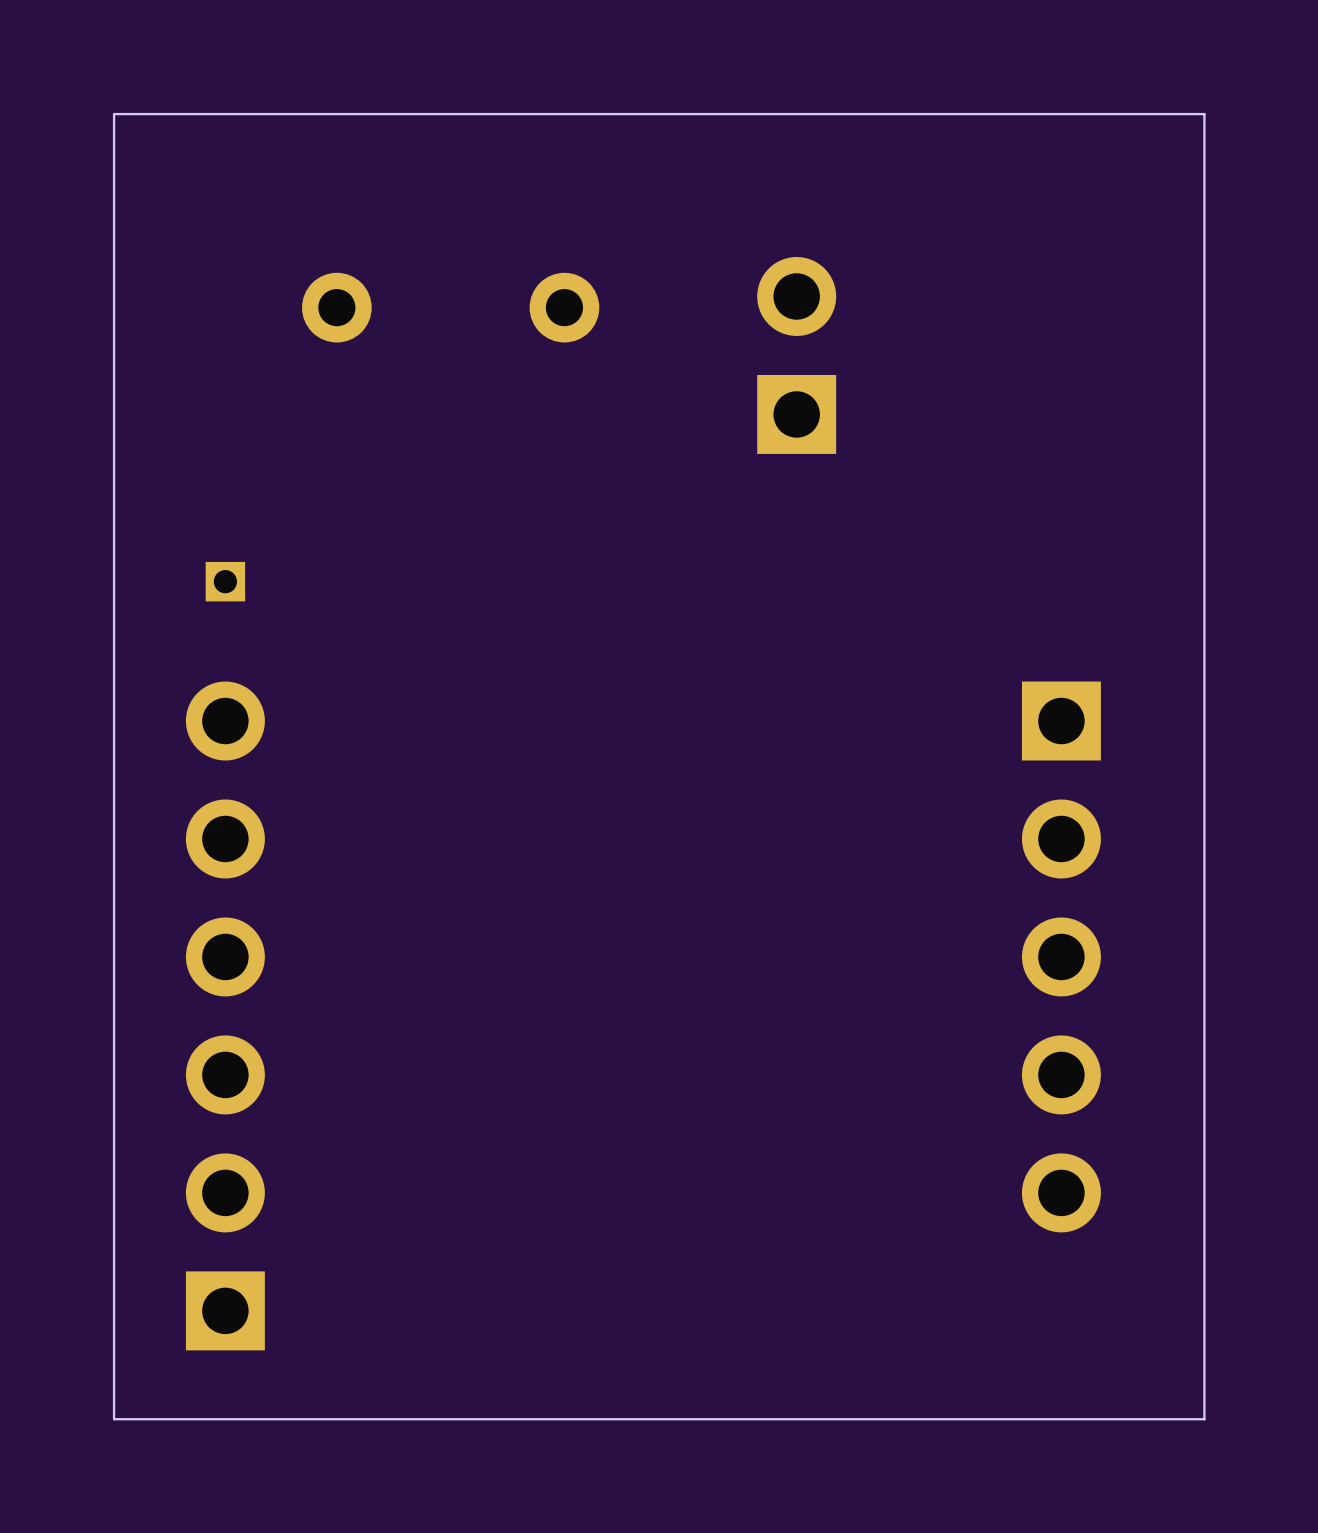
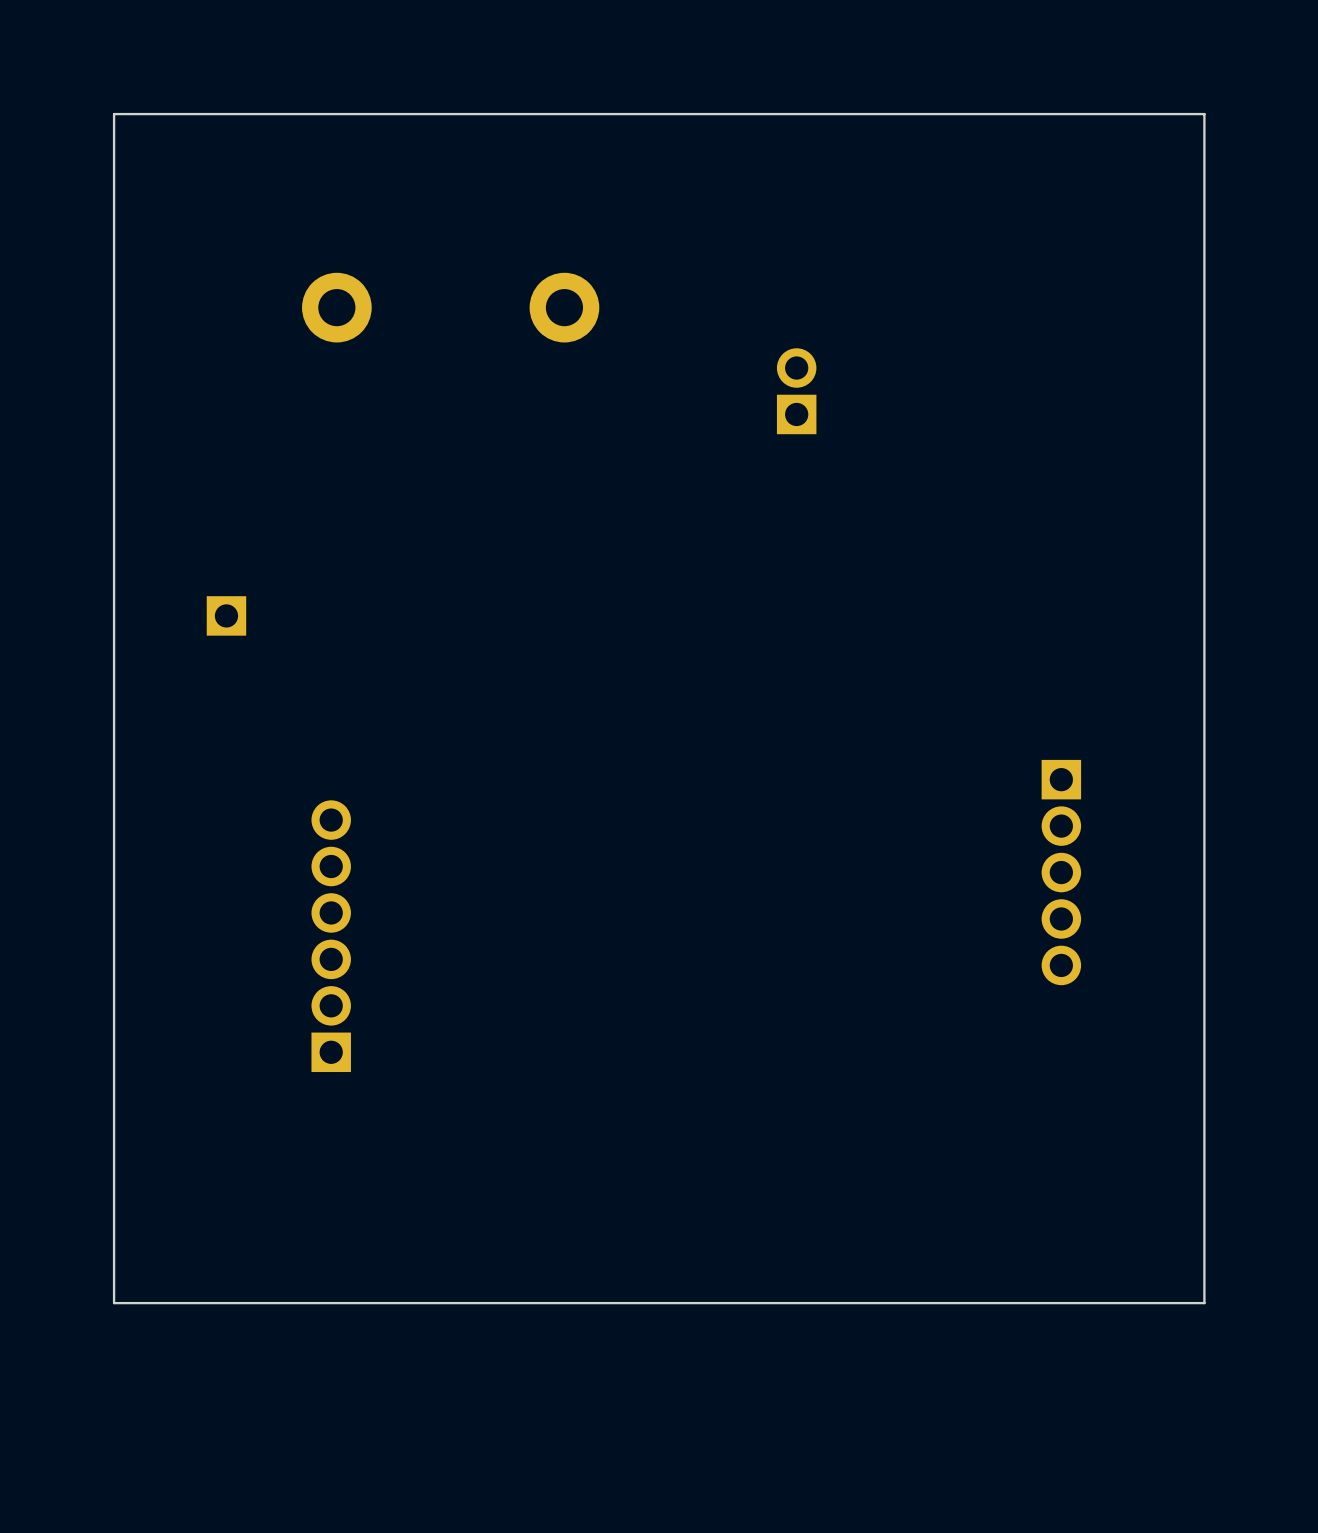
part footprint: [757, 257, 837, 454] -> [776, 348, 817, 435]
part position: (225, 581) -> (226, 615)
part: none -> (1061, 872)
part: none -> (331, 936)
part: (1061, 956) -> none
part: (225, 1015) -> none
board edge: (1204, 1303) (1204, 1419) (114, 1419) (114, 1303) -> (1204, 1303) (114, 1303)

